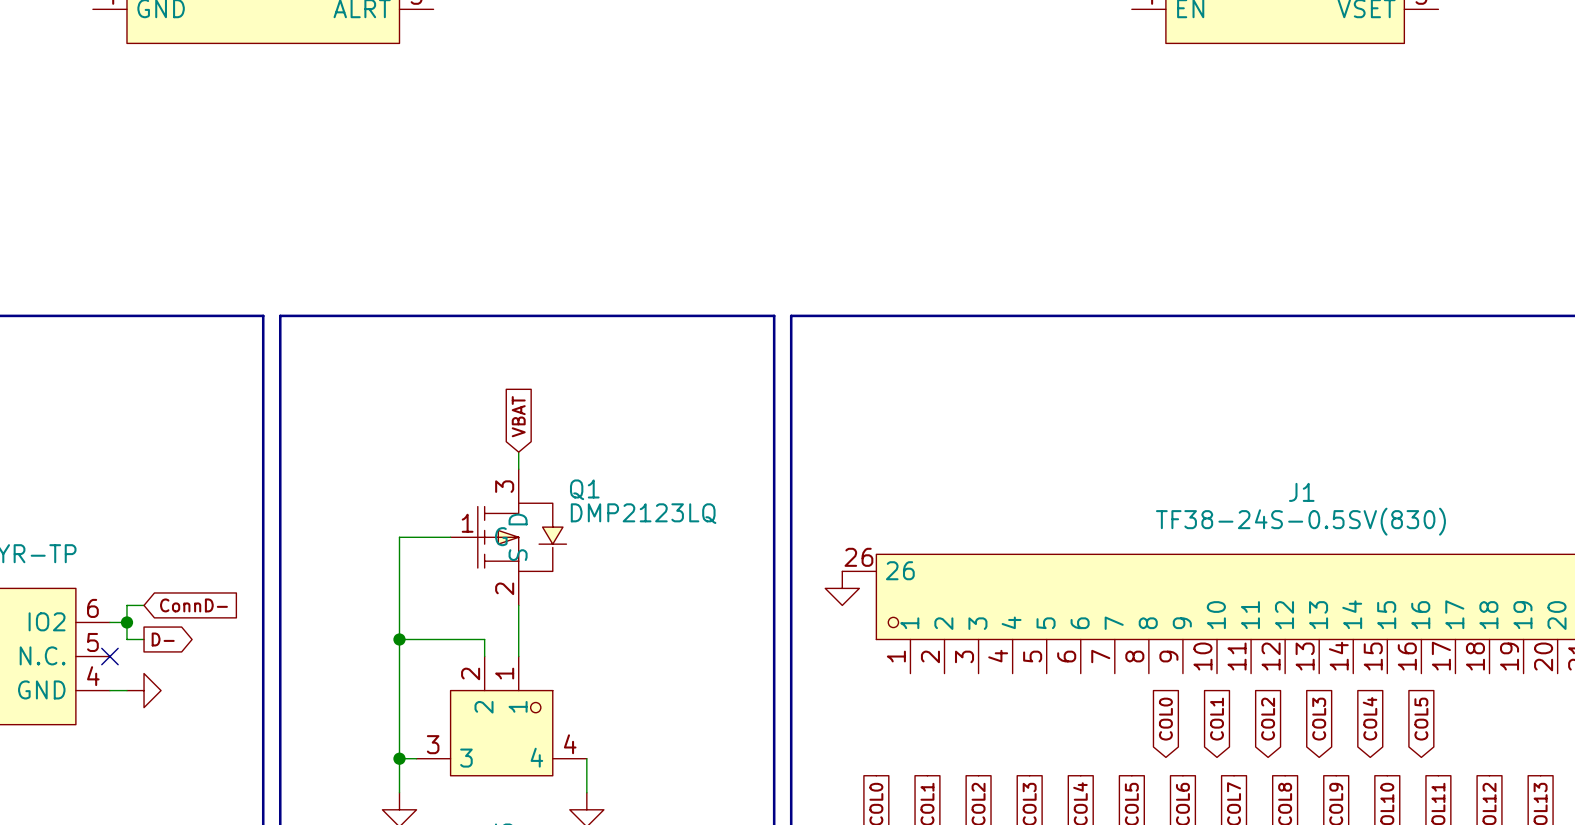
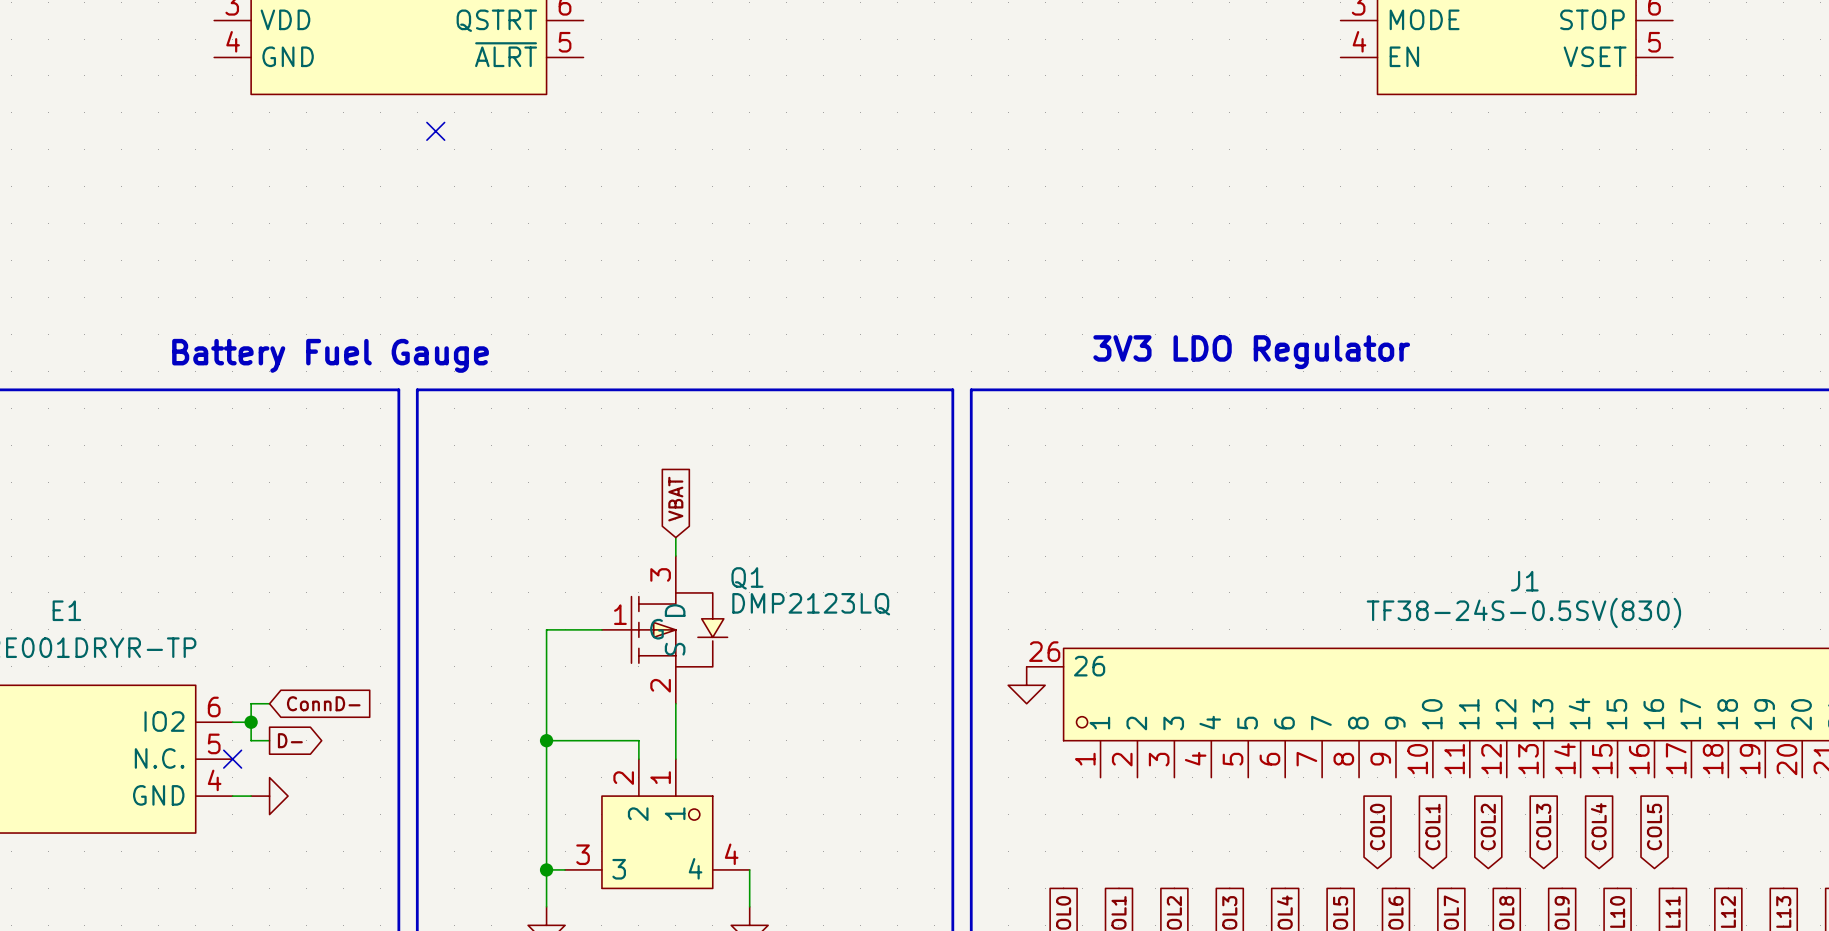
no-connect mark: none -> (435, 131)
text: none -> 3V3 LDO Regulator (1251, 352)
text: none -> Battery Fuel Gauge (330, 355)

